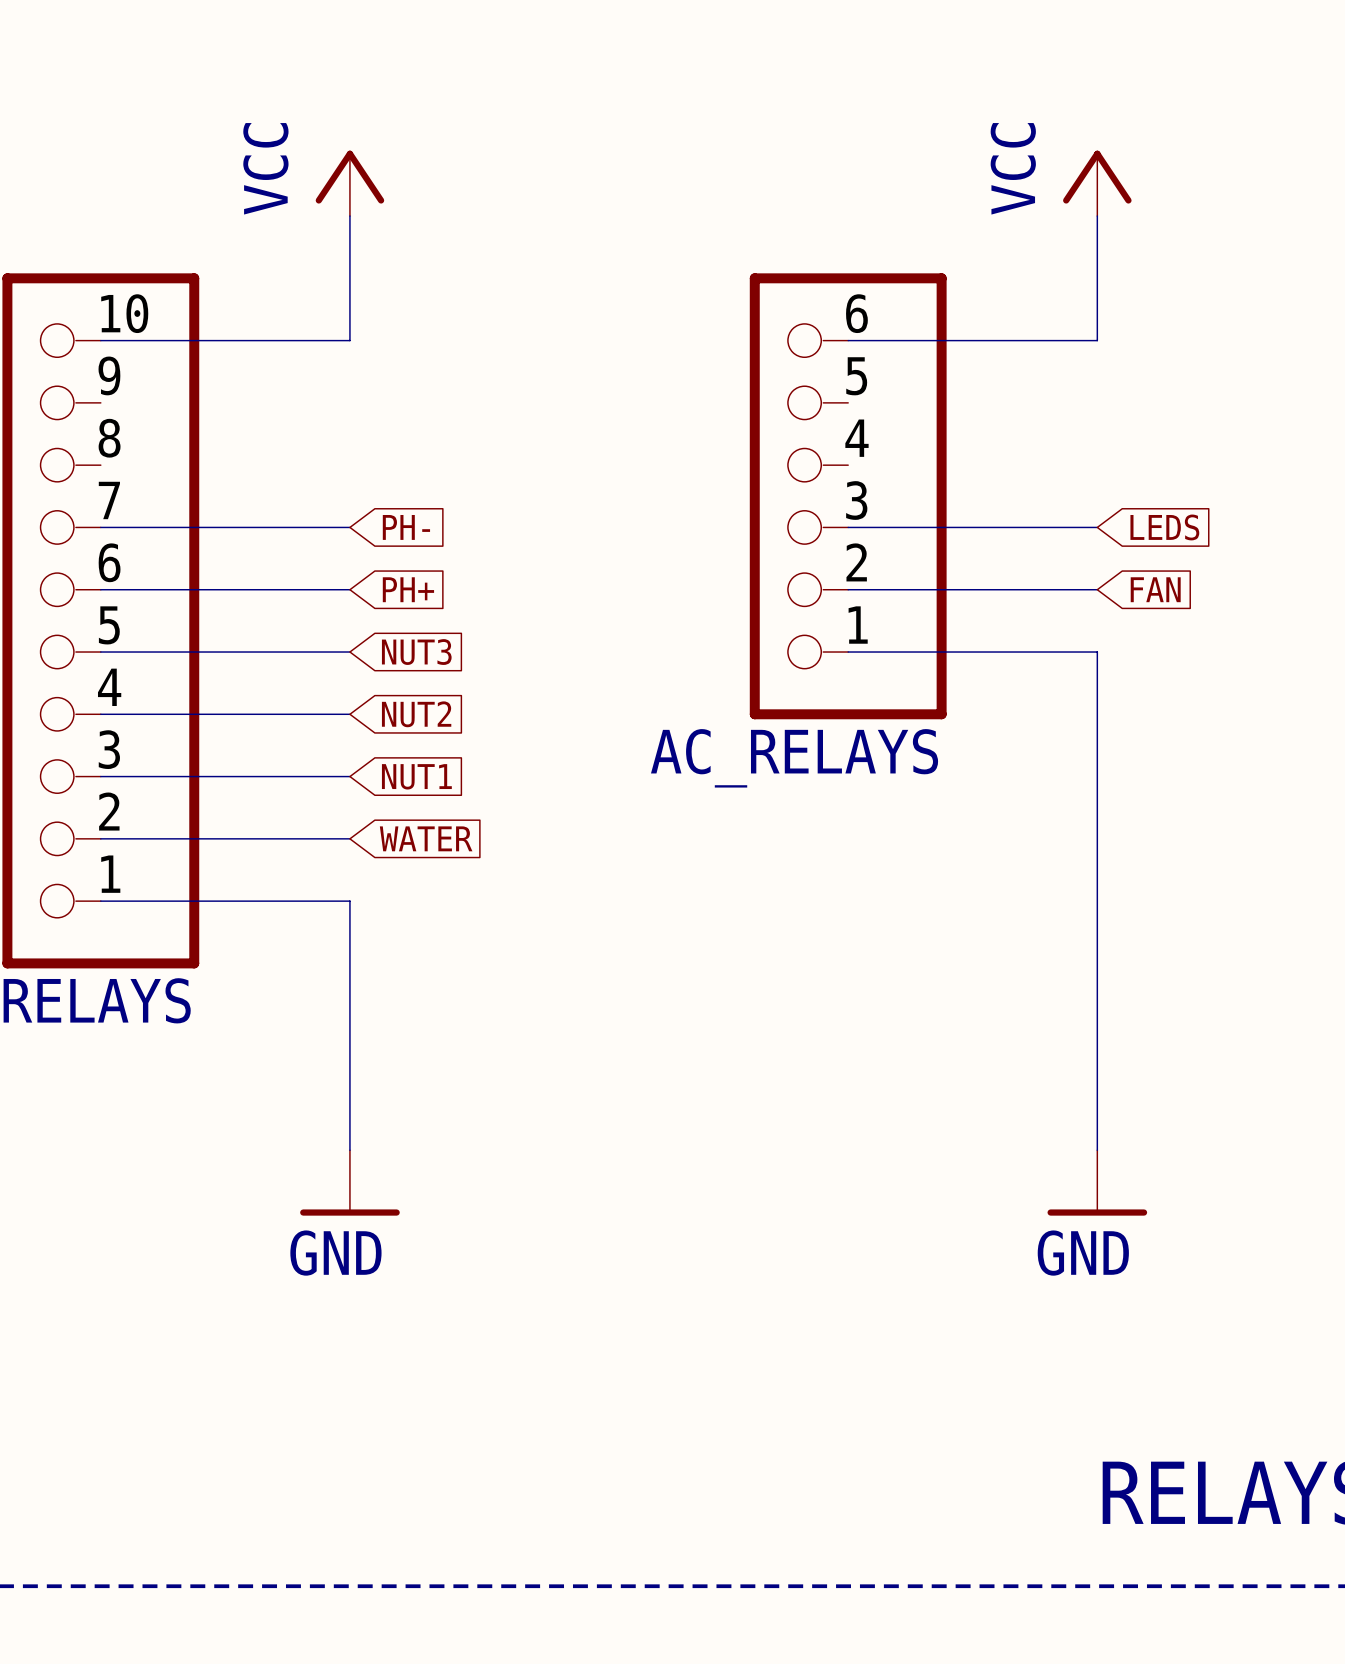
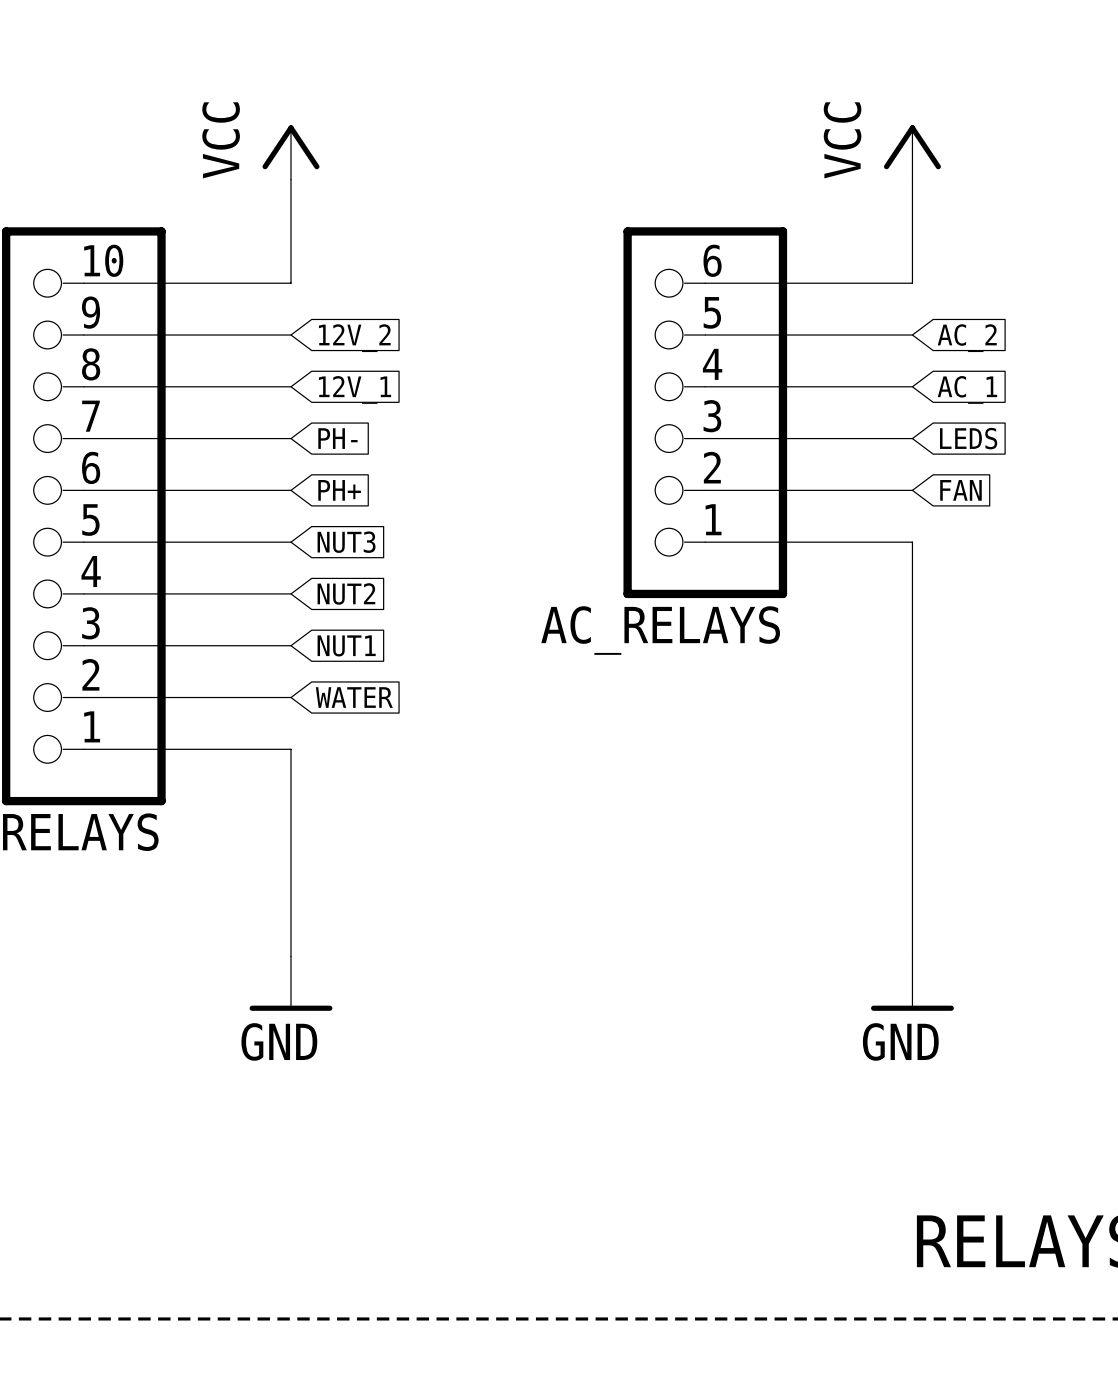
wire: none -> (83, 335) (290, 335)
wire: none -> (705, 335) (912, 335)
global label: none -> 12V_2 (354, 338)
global label: none -> AC_2 (967, 338)
wire: none -> (83, 386) (290, 386)
wire: none -> (705, 386) (912, 386)
global label: none -> 12V_1 (355, 389)
global label: none -> AC_1 (967, 389)

